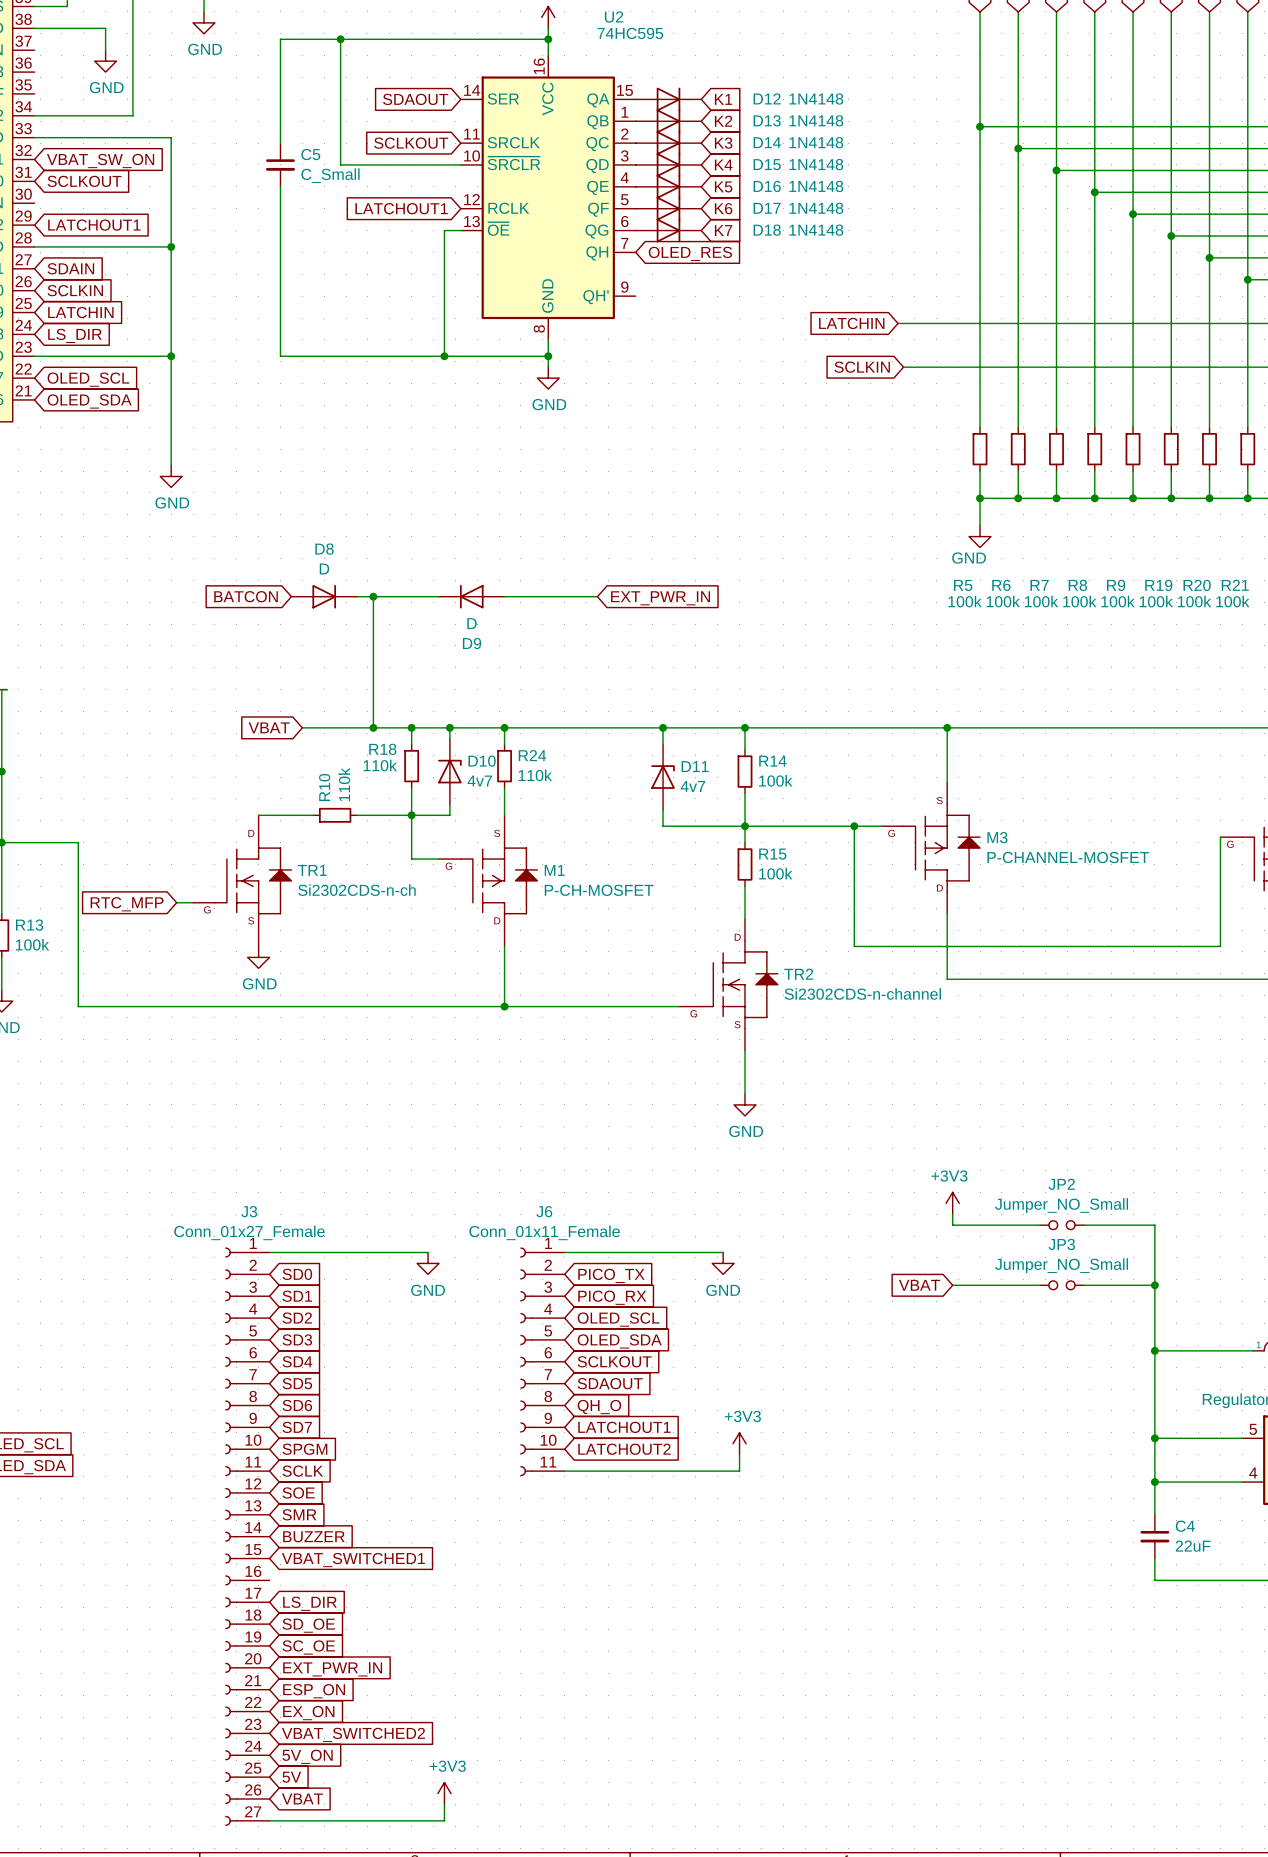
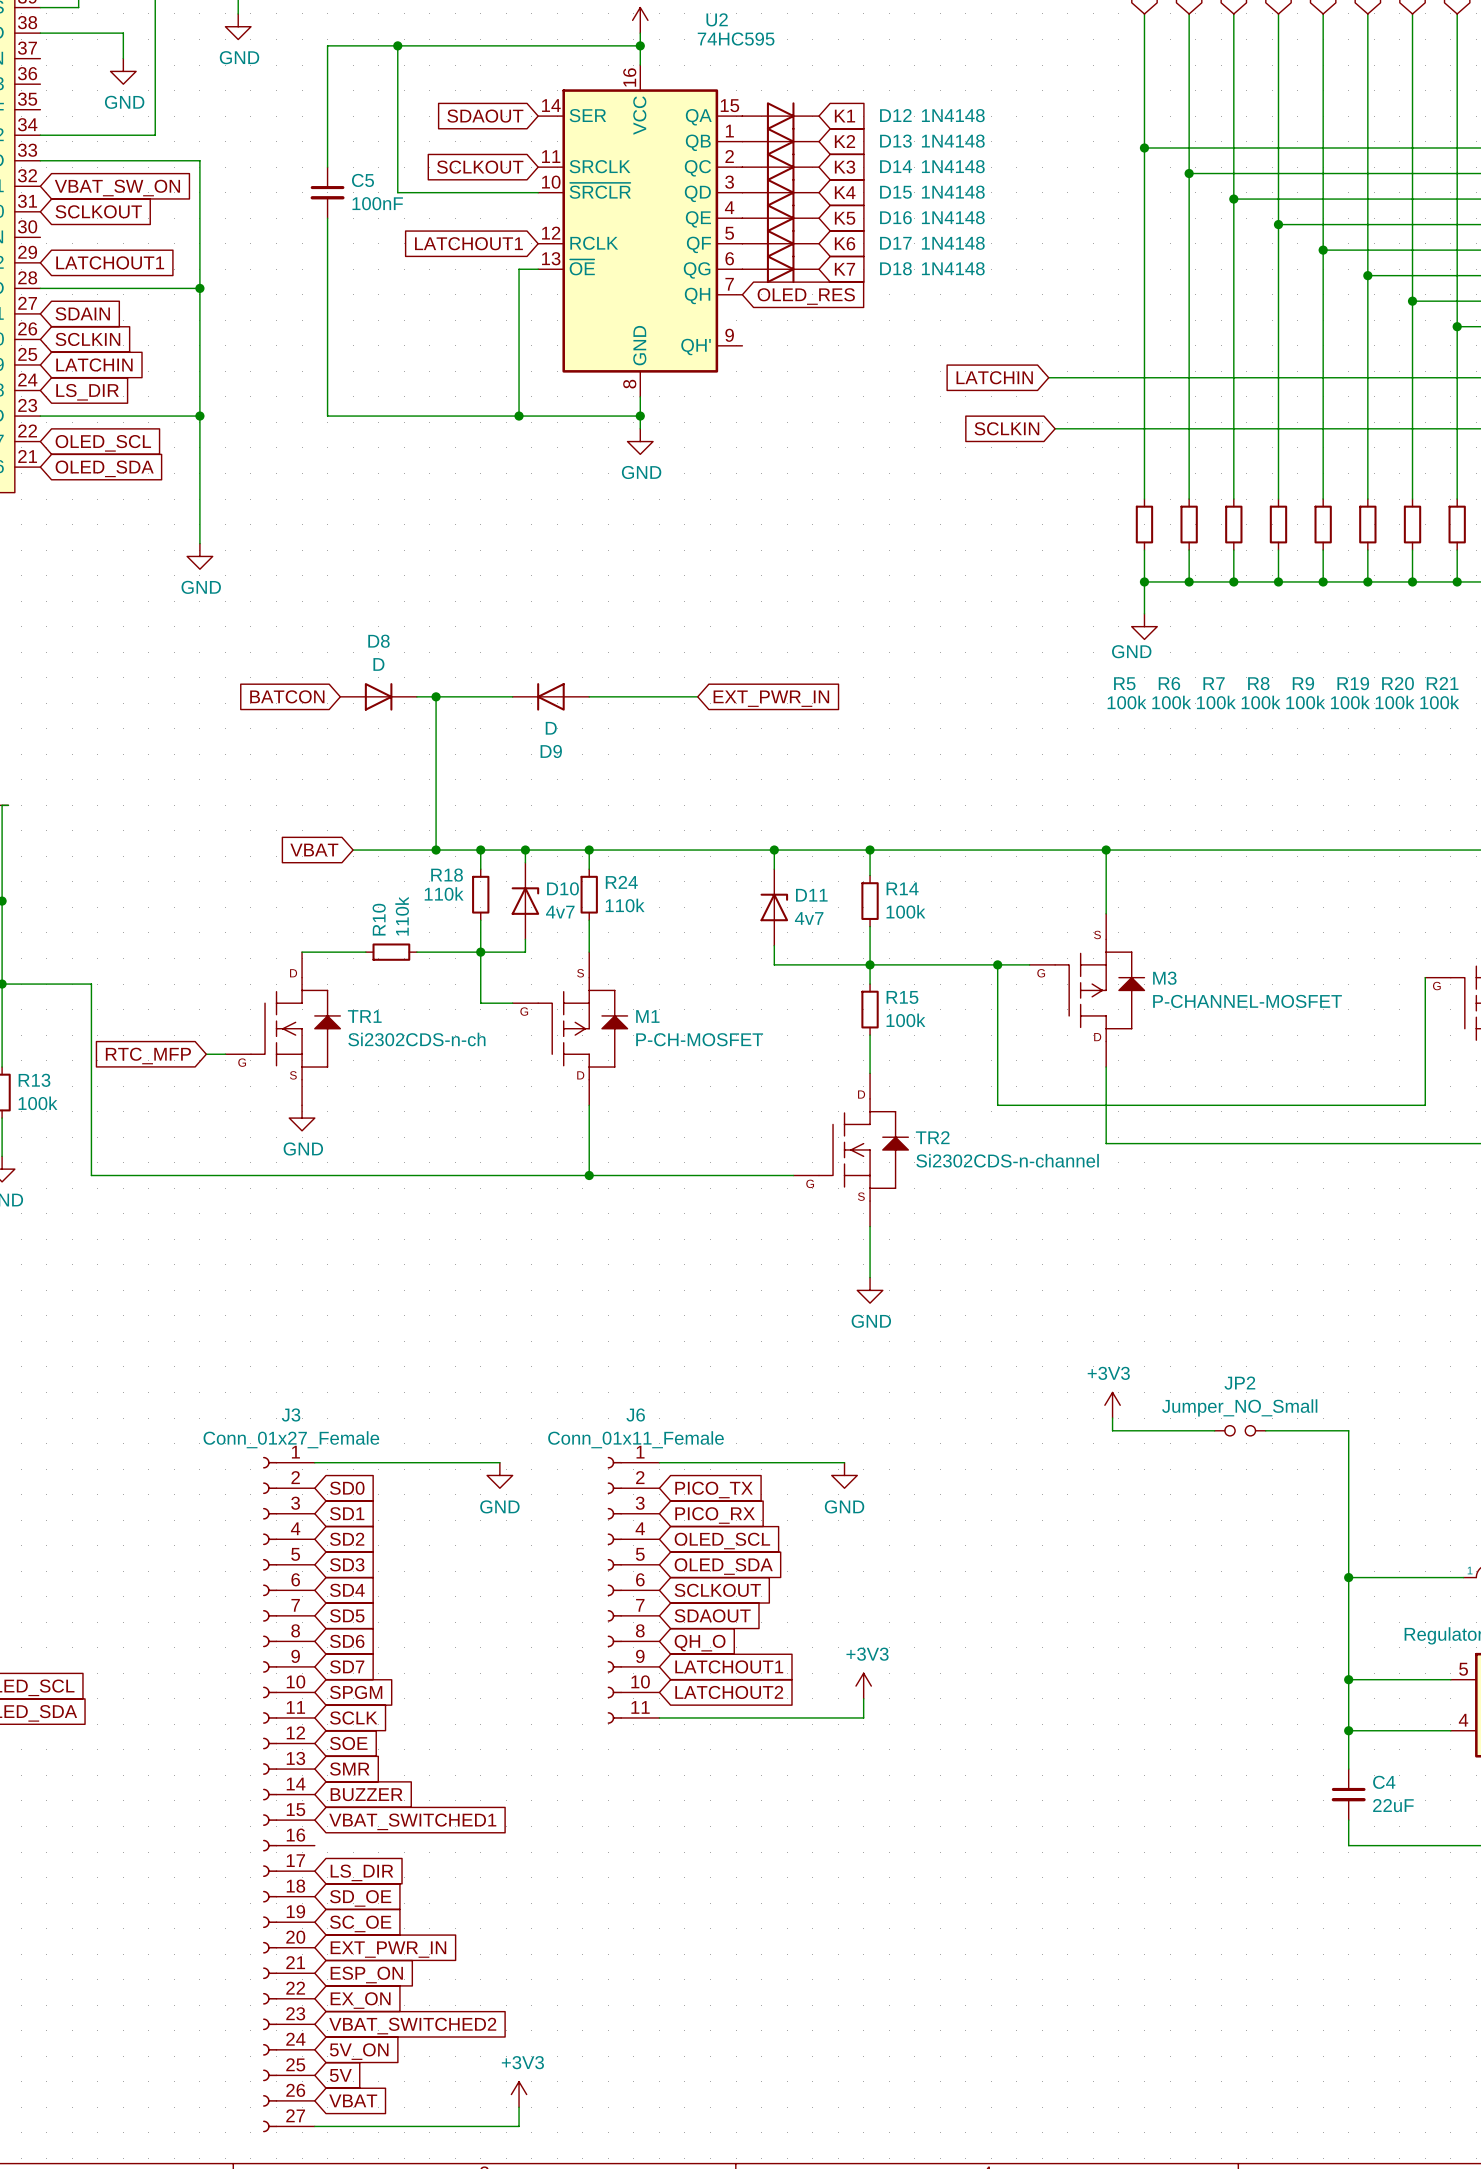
C5 value: C_Small (330, 175) -> 100nF (377, 203)
global label: VBAT (919, 1285) -> none
wire: (952, 1285) (1040, 1285) -> none
JP3: Jumper_NO_Small (1061, 1285) -> none
wire: (1083, 1285) (1154, 1285) -> none
junction: (1154, 1285) -> none

